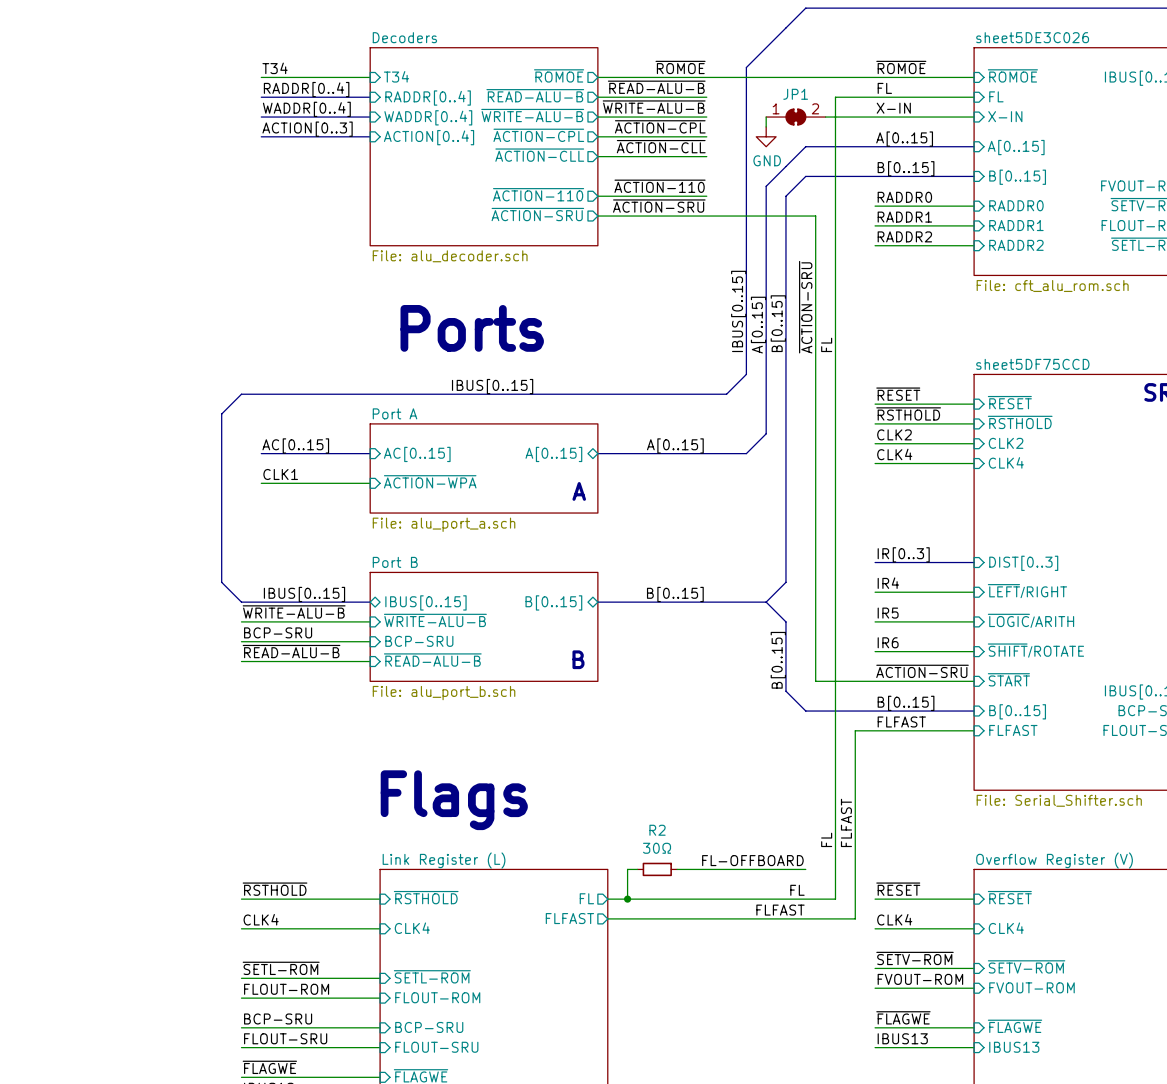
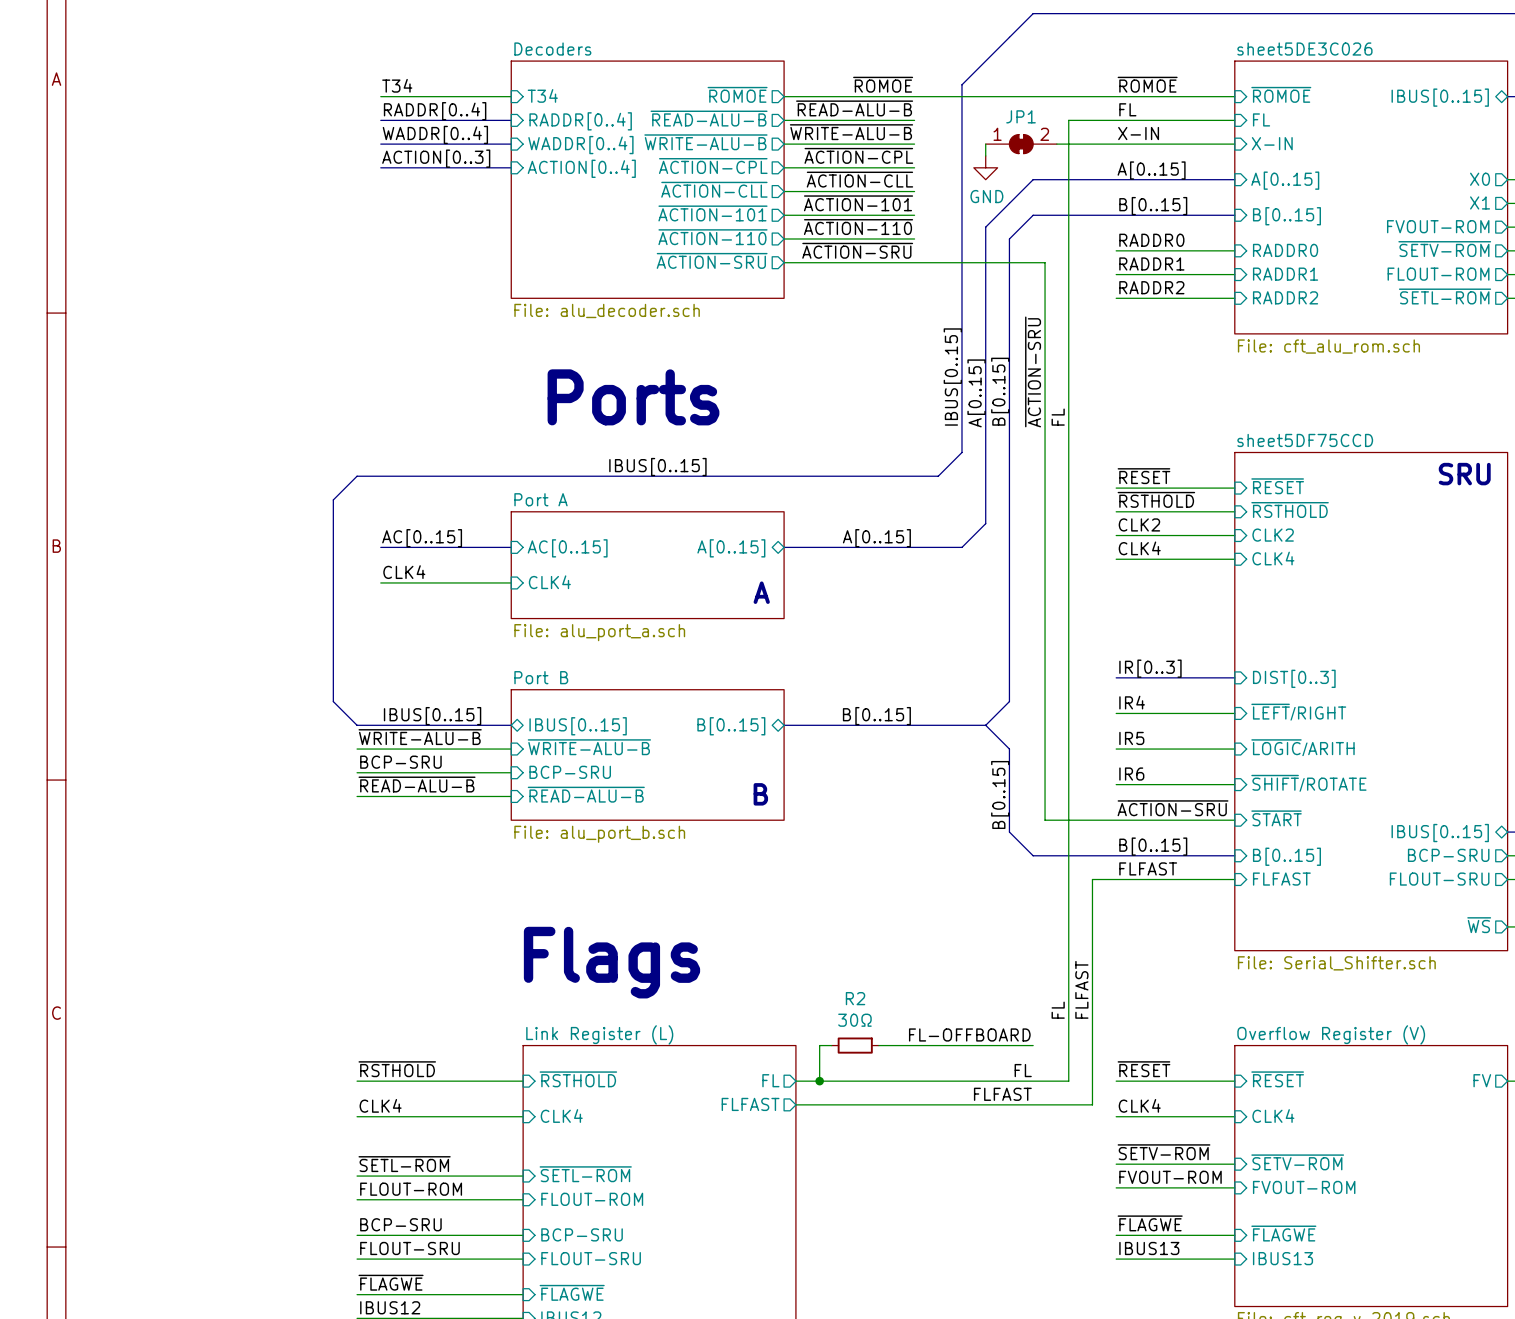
label: none -> ~{ACTION-101} (858, 203)
sheet pin: none -> ~{ACTION-101} (712, 213)
wire: none -> (784, 215) (914, 215)
label: CLK1 (280, 474) -> CLK4 (404, 572)
sheet pin: ~{ACTION-WPA} (430, 481) -> CLK4 (549, 582)

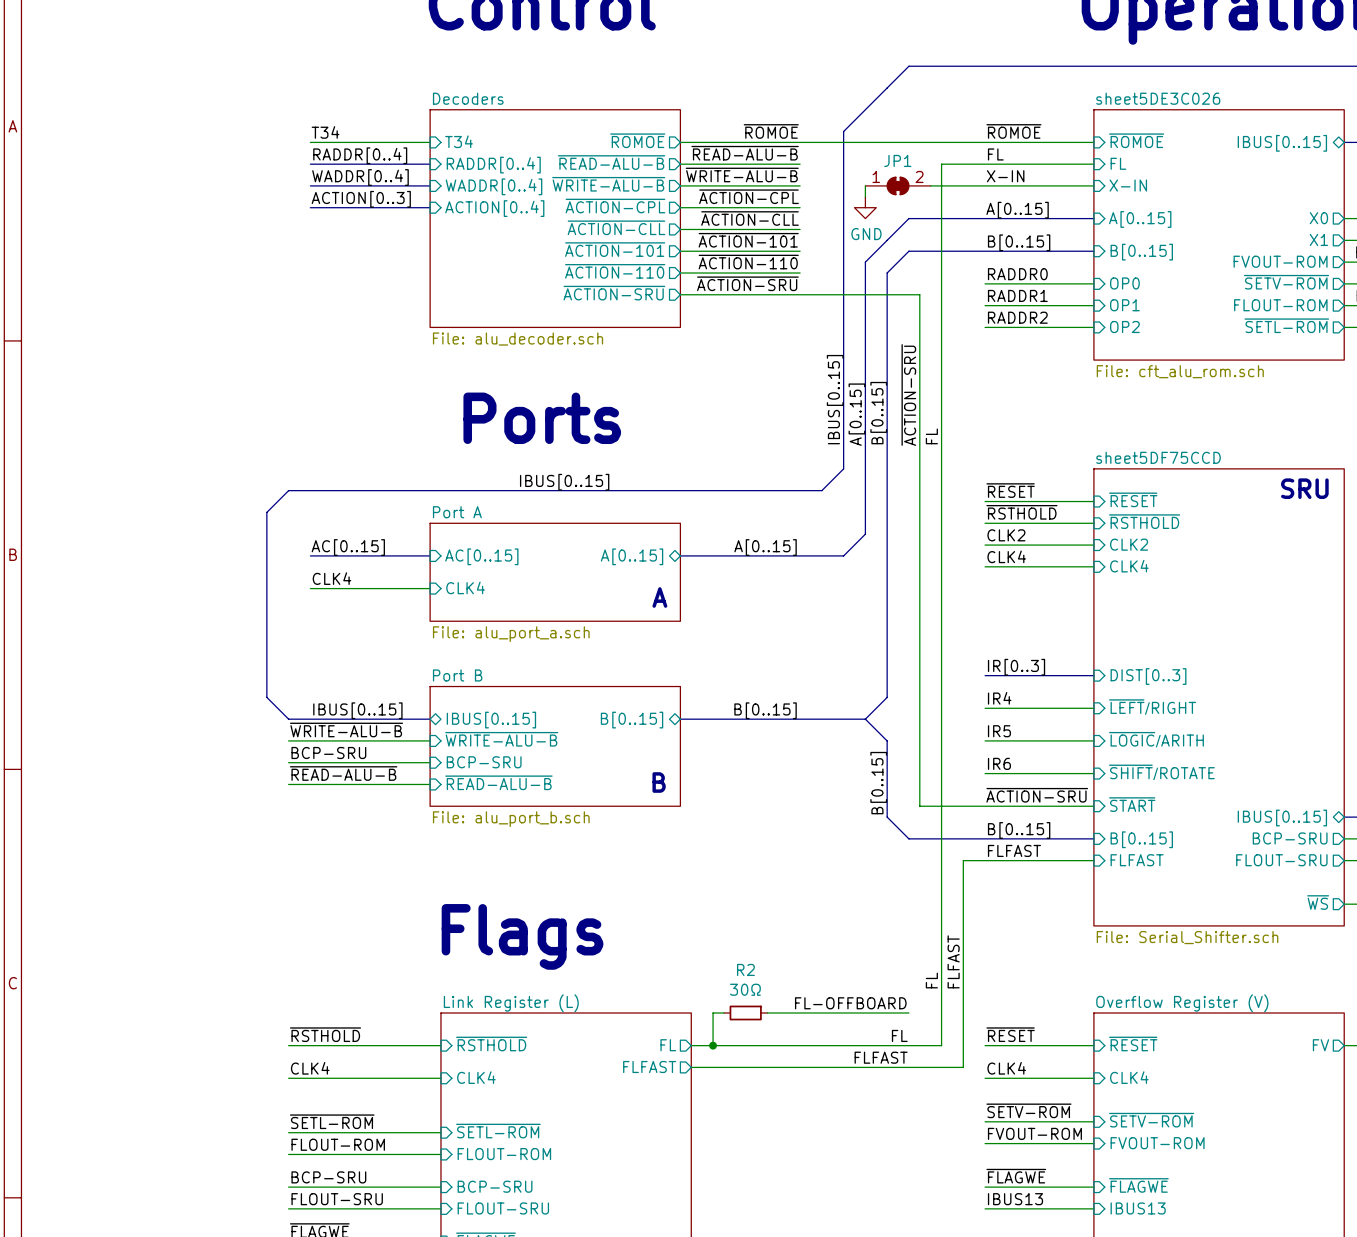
sheet pin: RADDR0 (1285, 250) -> OP0 (1124, 283)
sheet pin: RADDR1 (1285, 274) -> OP1 (1124, 305)
sheet pin: RADDR2 (1285, 297) -> OP2 (1124, 327)

